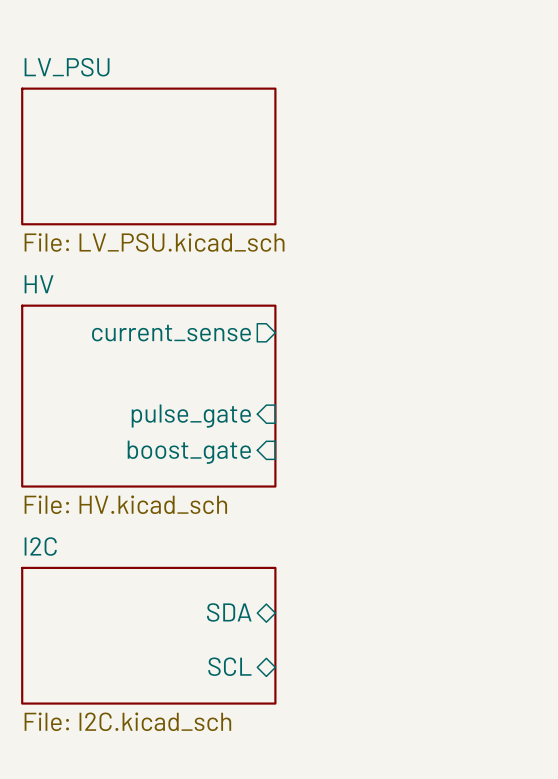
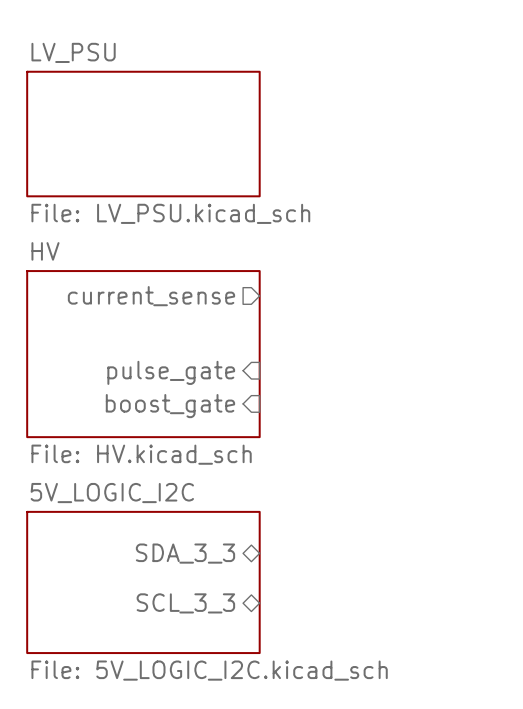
sheet pin: SDA (229, 612) -> SDA_3_3 (185, 553)
sheet I2C: File: I2C.kicad_sch (148, 635) -> none
sheet 5V_LOGIC_I2C: none -> File: 5V_LOGIC_I2C.kicad_sch (143, 582)
sheet pin: SCL (229, 666) -> SCL_3_3 (185, 603)

